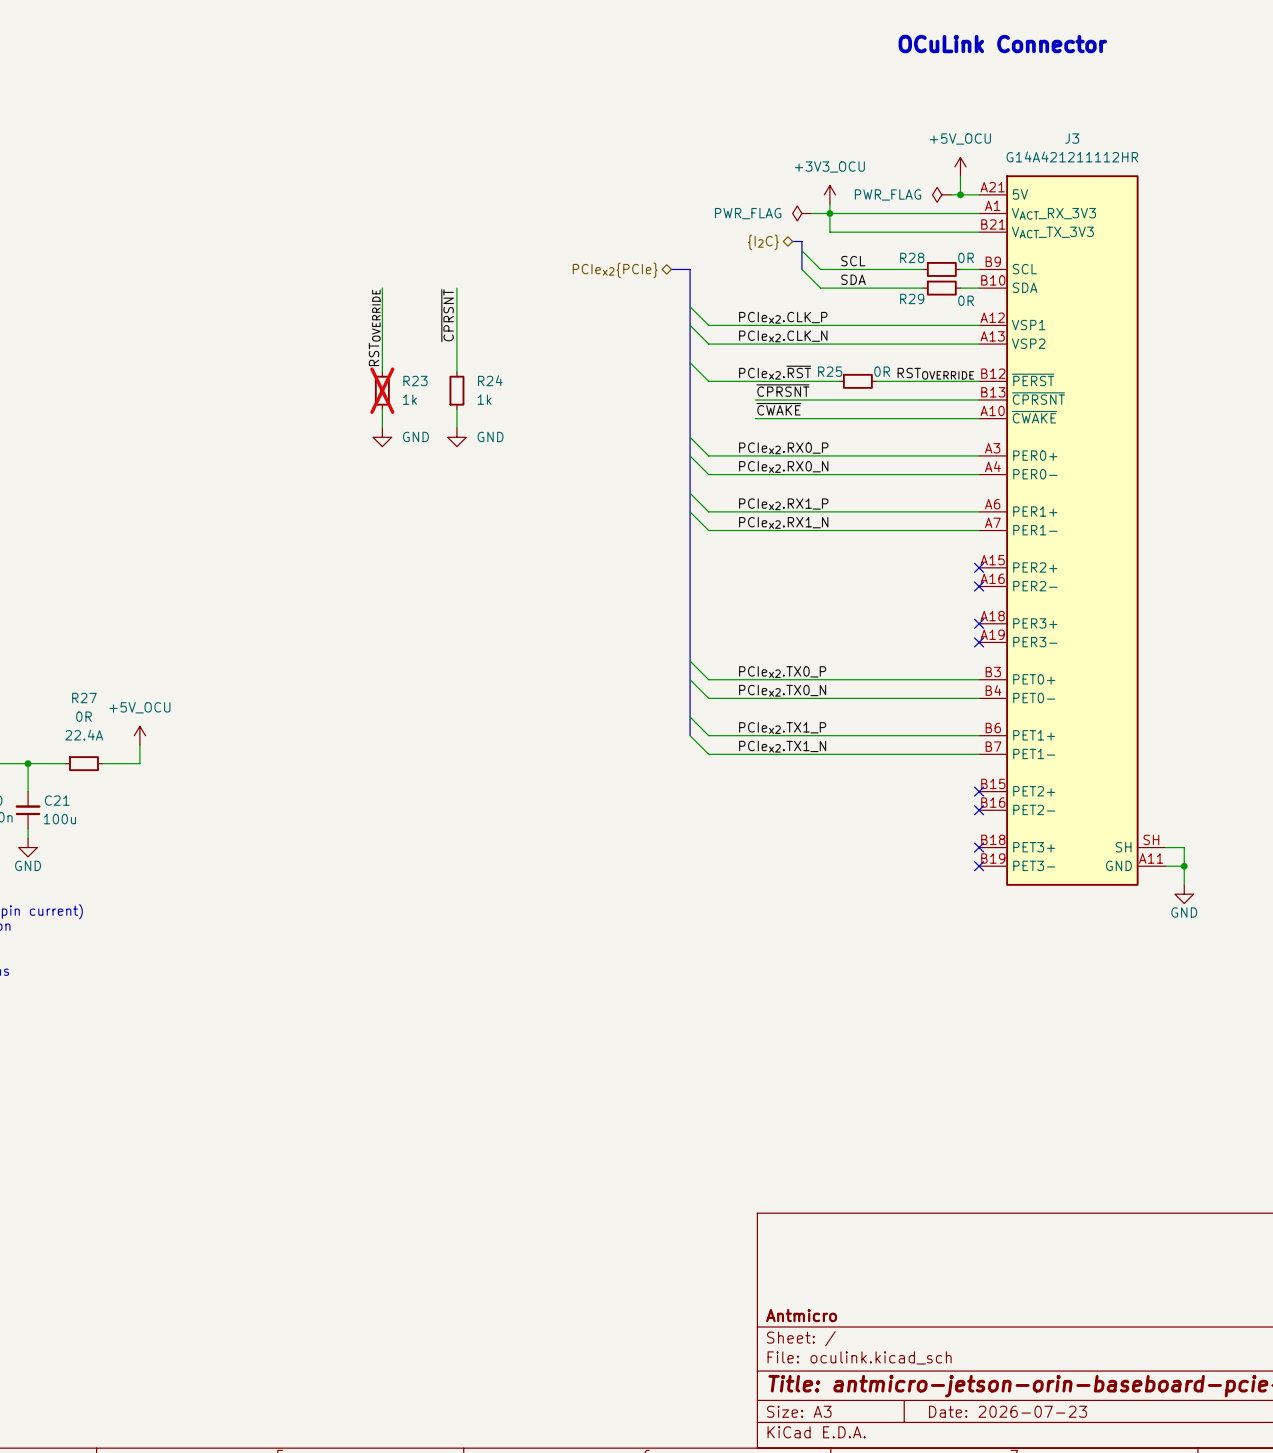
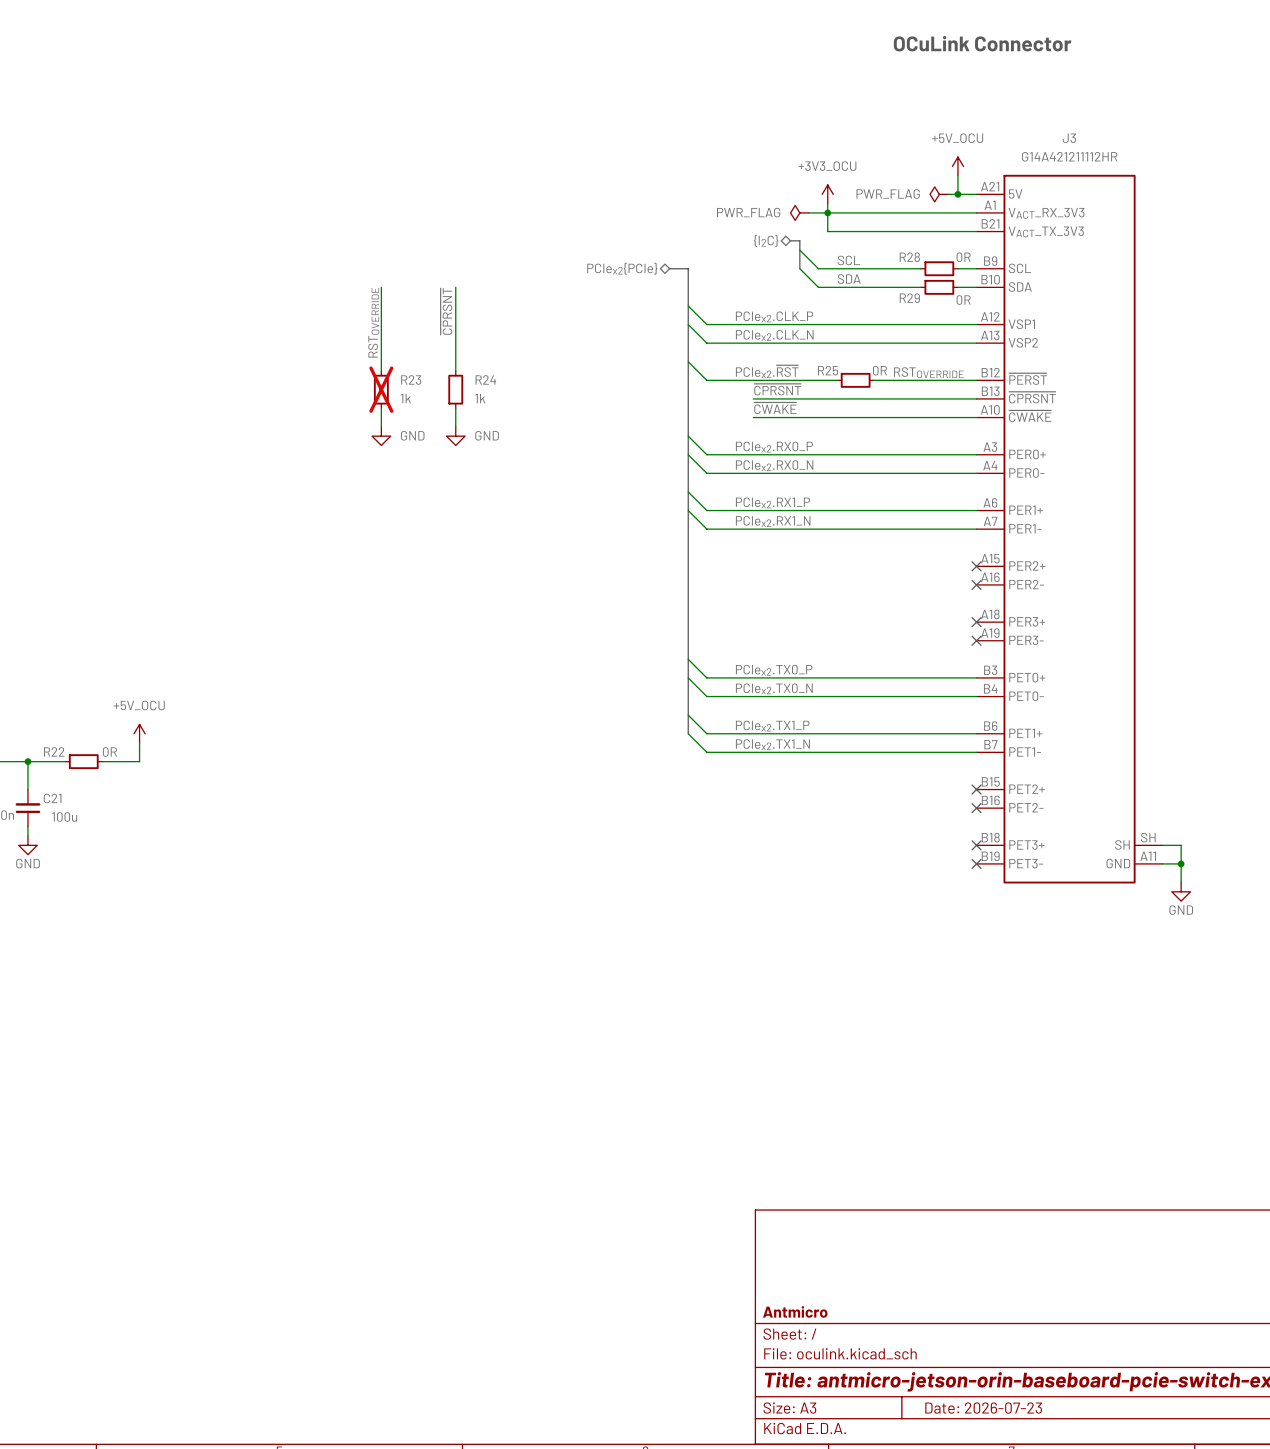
R27 name: R27 (84, 698) -> R22 (54, 751)
R27 text position: 0R (83, 716) -> 0R (109, 752)
R27 text: 22.4A (84, 735) -> none

